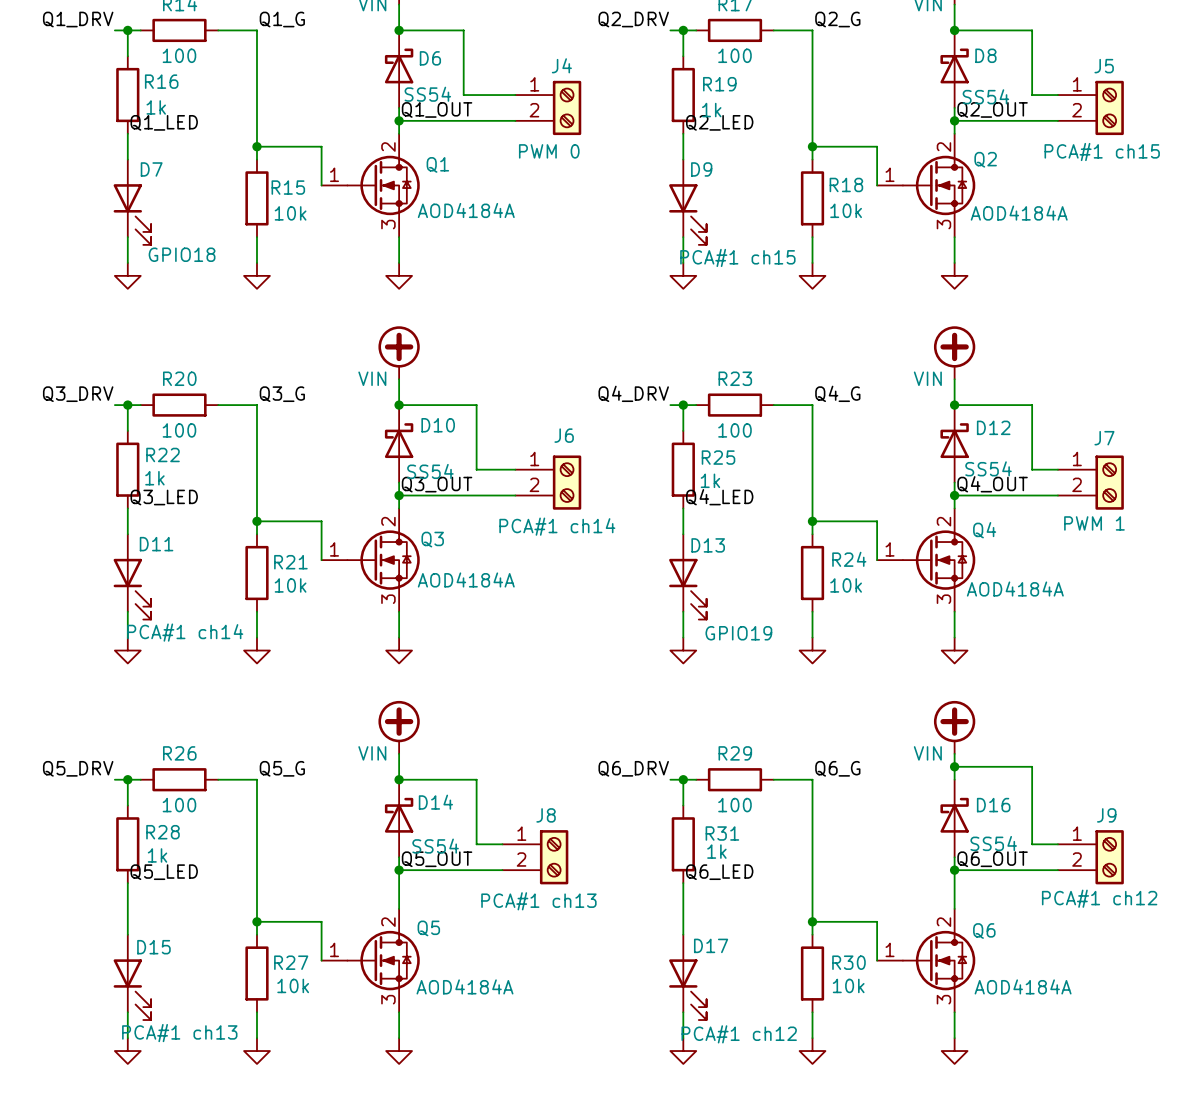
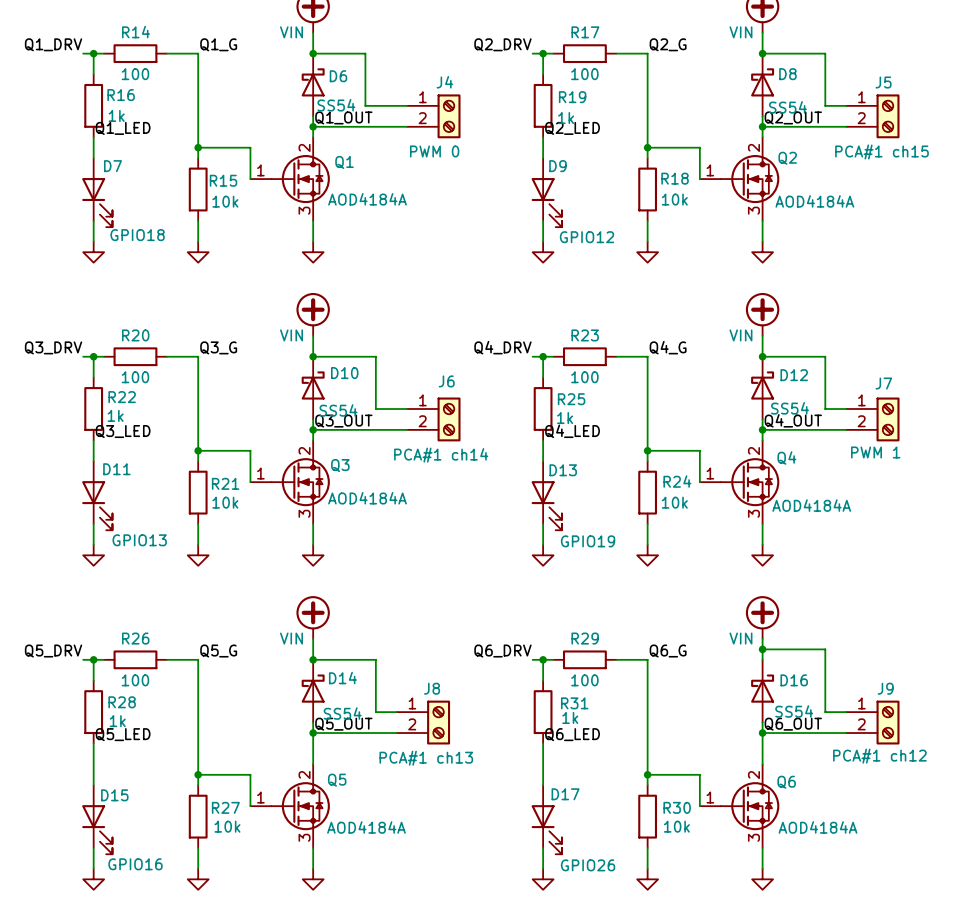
D9 value: PCA#1 ch15 (737, 257) -> GPIO12 (587, 237)
D11 value: PCA#1 ch14 (185, 632) -> GPIO13 (139, 540)
D15 value: PCA#1 ch13 (179, 1033) -> GPIO16 (135, 864)
D17 value: PCA#1 ch12 (739, 1034) -> GPIO26 (588, 865)

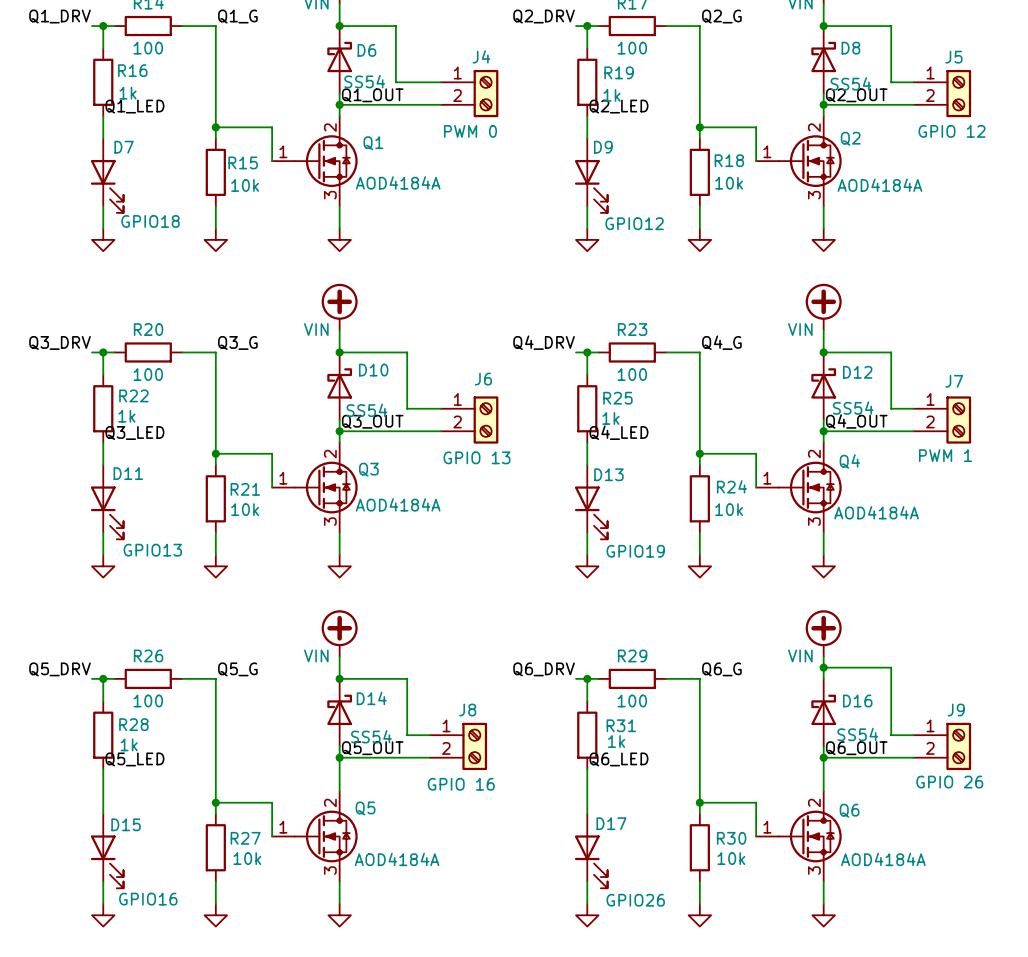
J5 value: PCA#1 ch15 (881, 151) -> GPIO 12 (951, 131)
J6 value: PCA#1 ch14 (441, 455) -> GPIO 13 (476, 457)
J9 value: PCA#1 ch12 (879, 756) -> GPIO 26 (949, 782)
J8 value: PCA#1 ch13 (426, 758) -> GPIO 16 (461, 784)

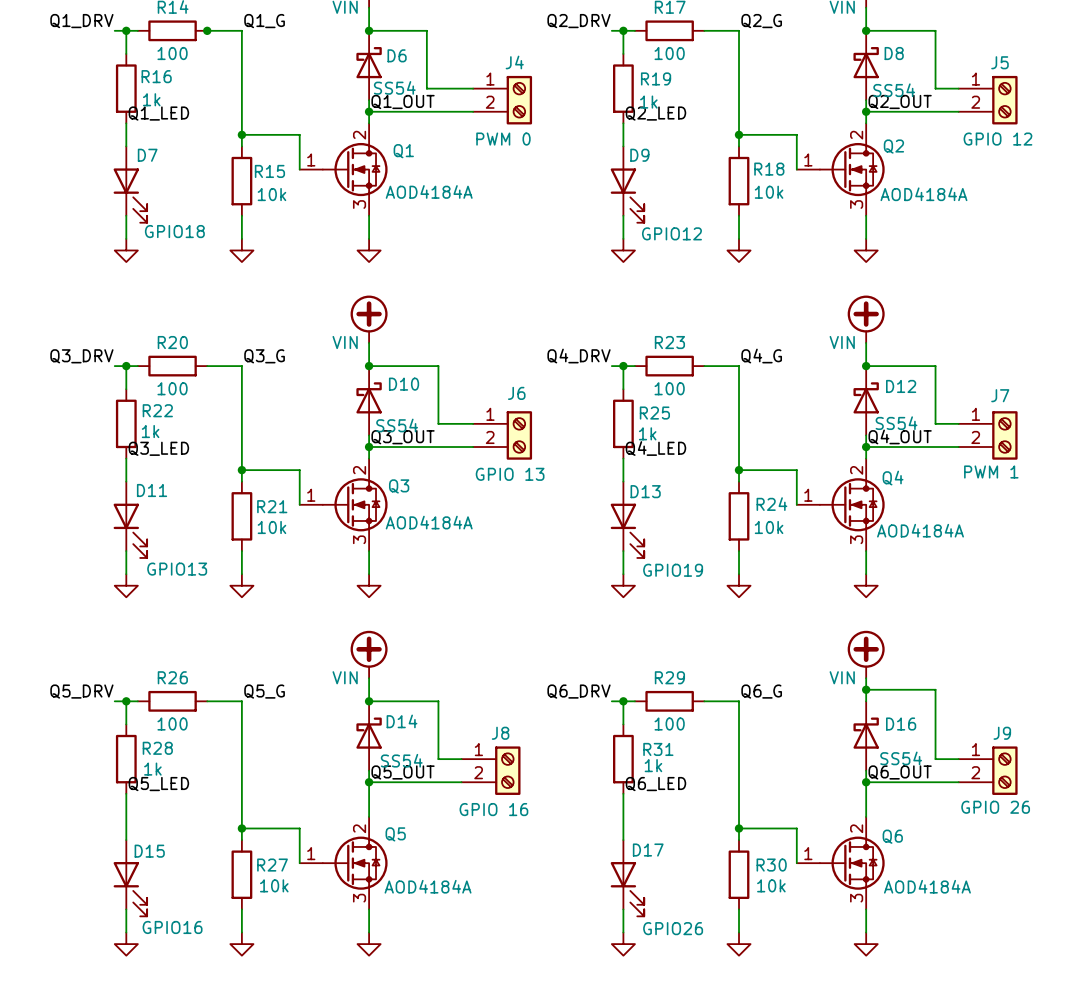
junction: none -> (207, 30)

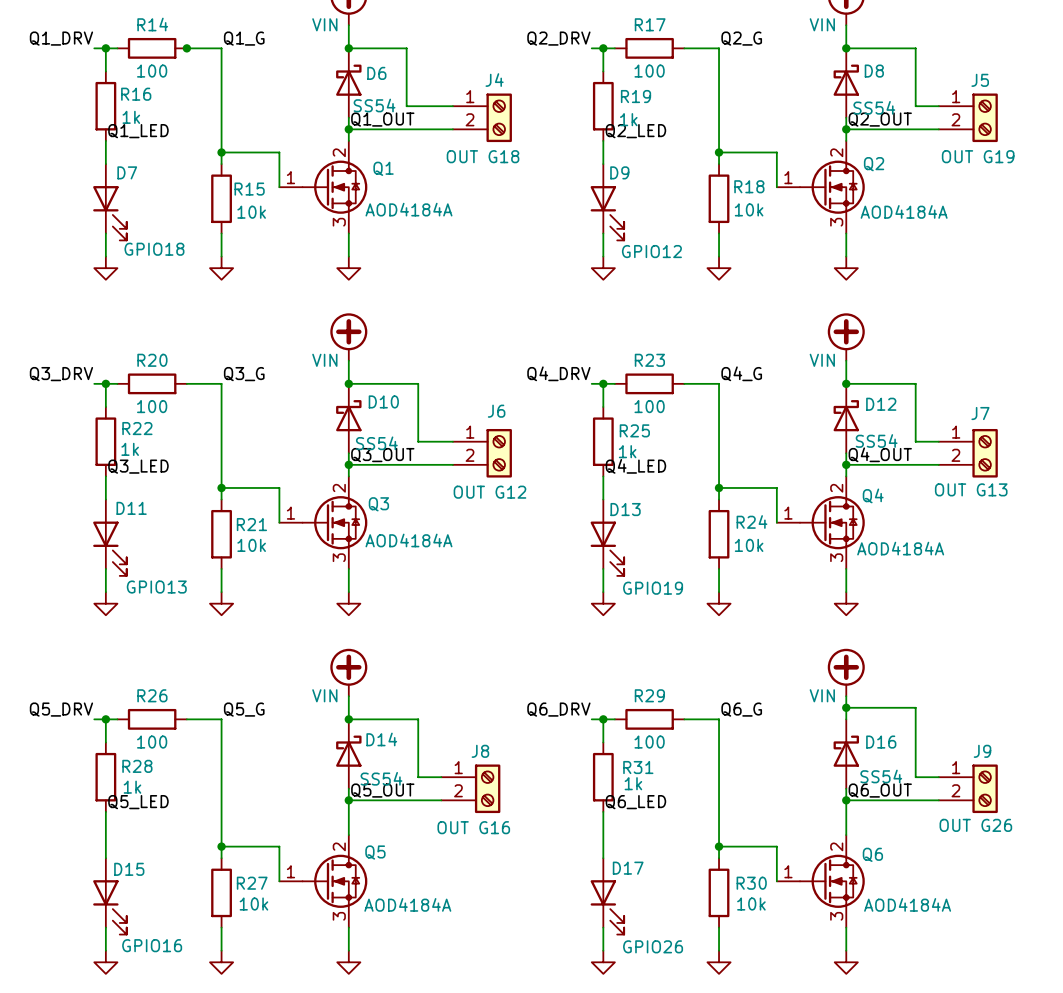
J4 value: PWM 0 (503, 139) -> OUT G18 (483, 156)
J5 value: GPIO 12 (997, 139) -> OUT G19 (978, 156)
J7 value: PWM 1 (991, 472) -> OUT G13 (971, 489)
J6 value: GPIO 13 (510, 474) -> OUT G12 (489, 492)
J9 value: GPIO 26 (995, 807) -> OUT G26 (975, 825)
J8 value: GPIO 16 (493, 809) -> OUT G16 (473, 827)

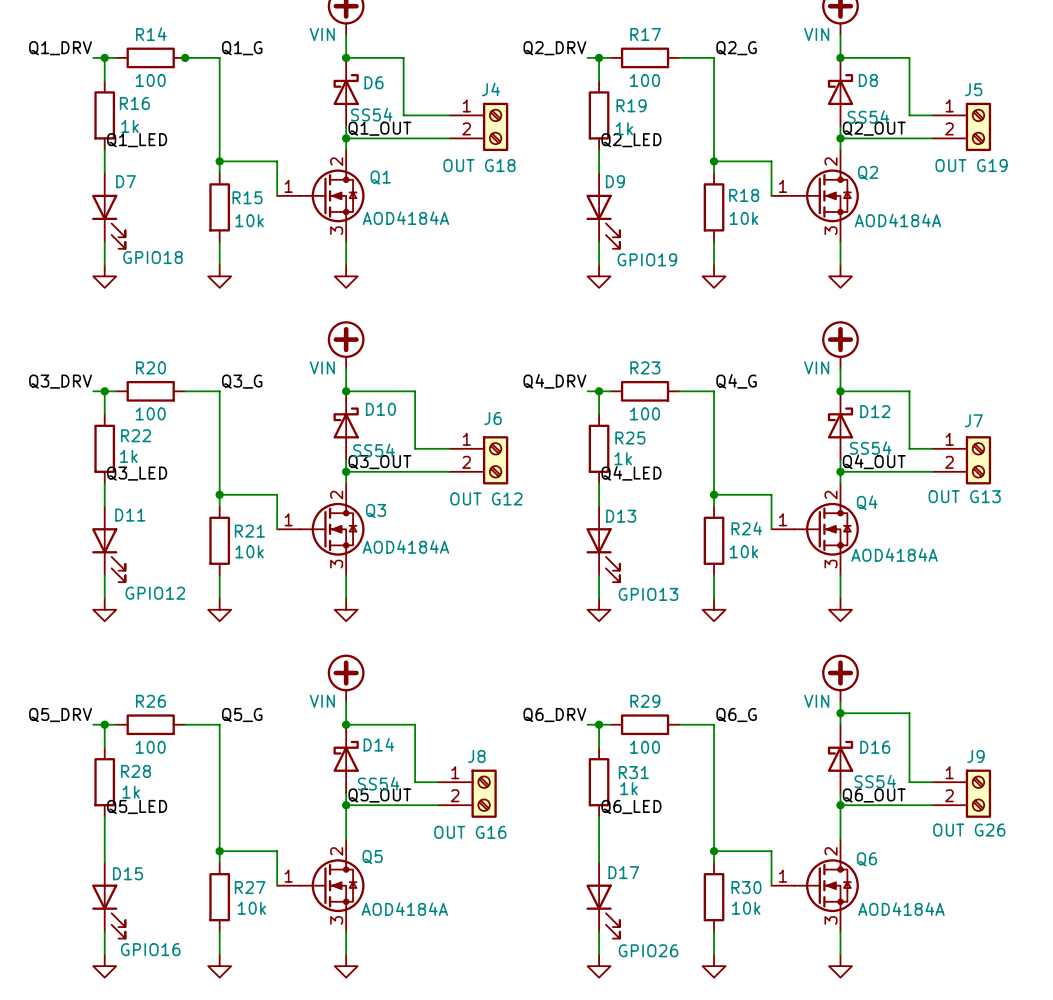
D9 value: GPIO12 (651, 251) -> GPIO19 (647, 259)
D11 value: GPIO13 (156, 587) -> GPIO12 (155, 593)
D13 value: GPIO19 (653, 588) -> GPIO13 (648, 594)

